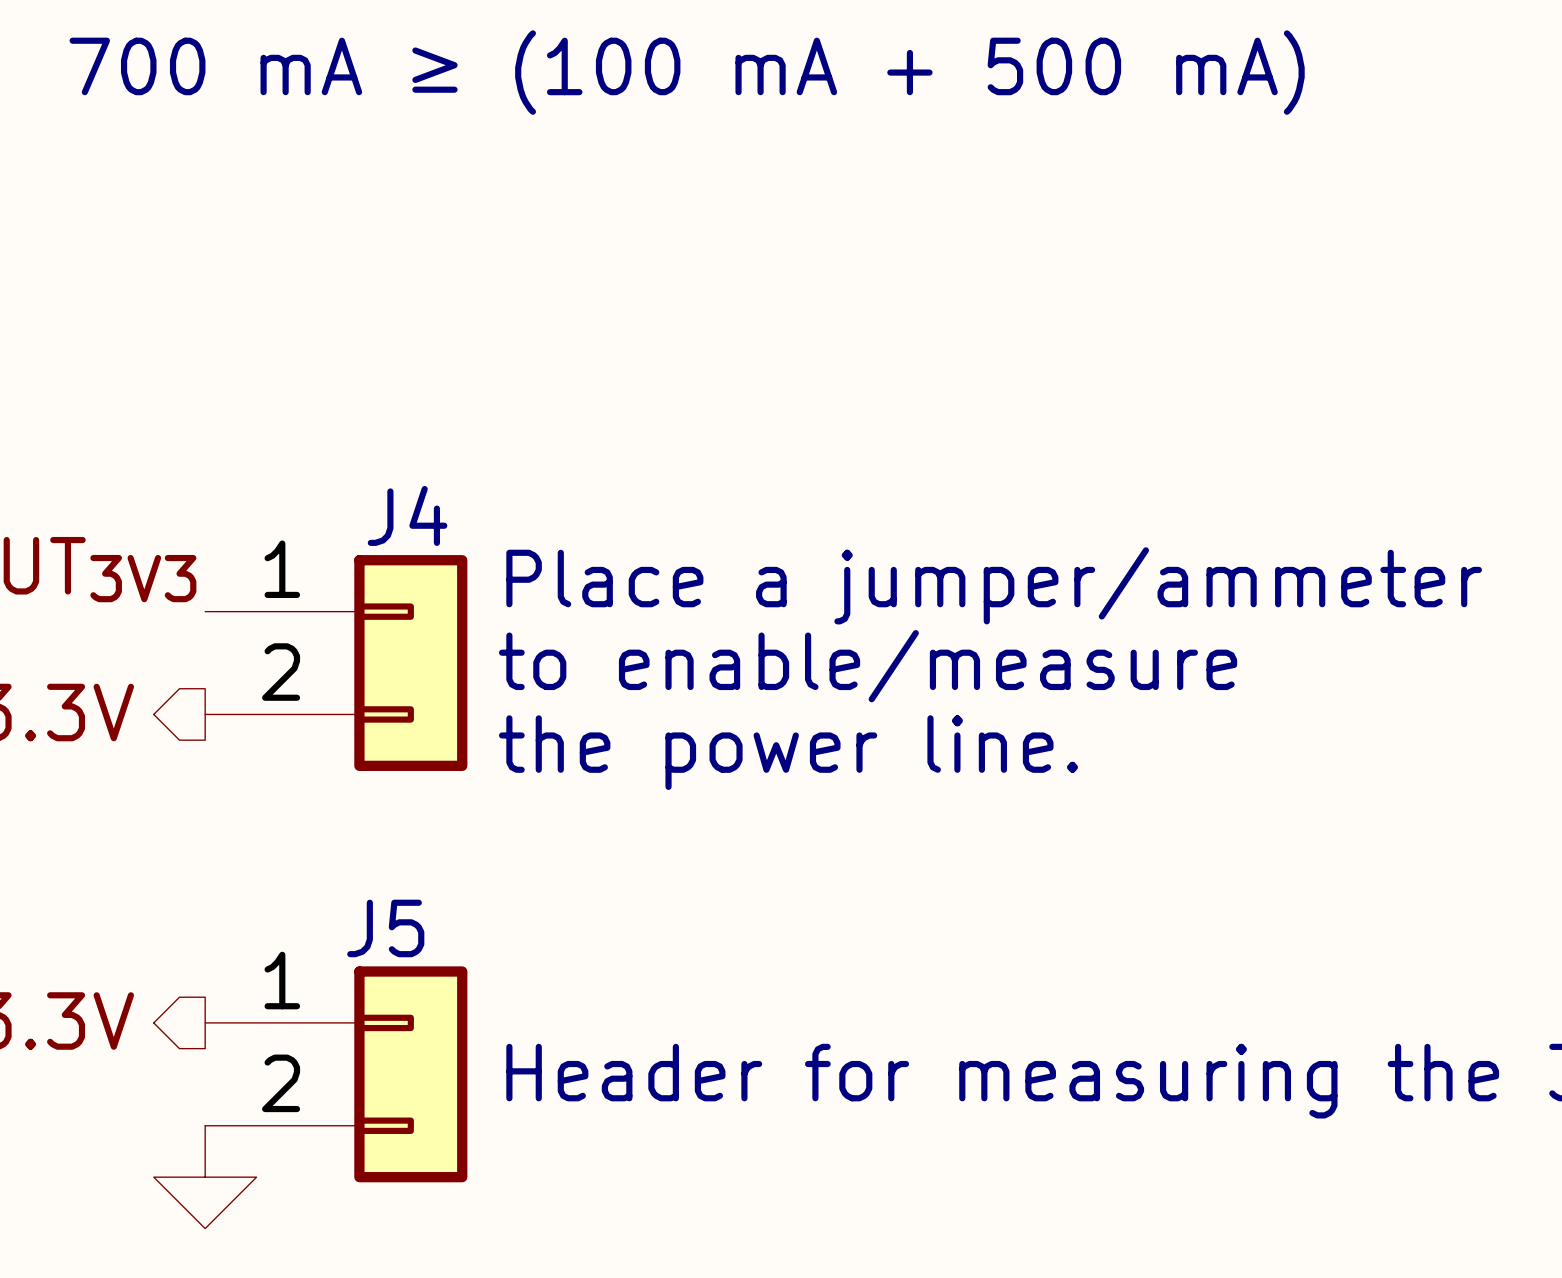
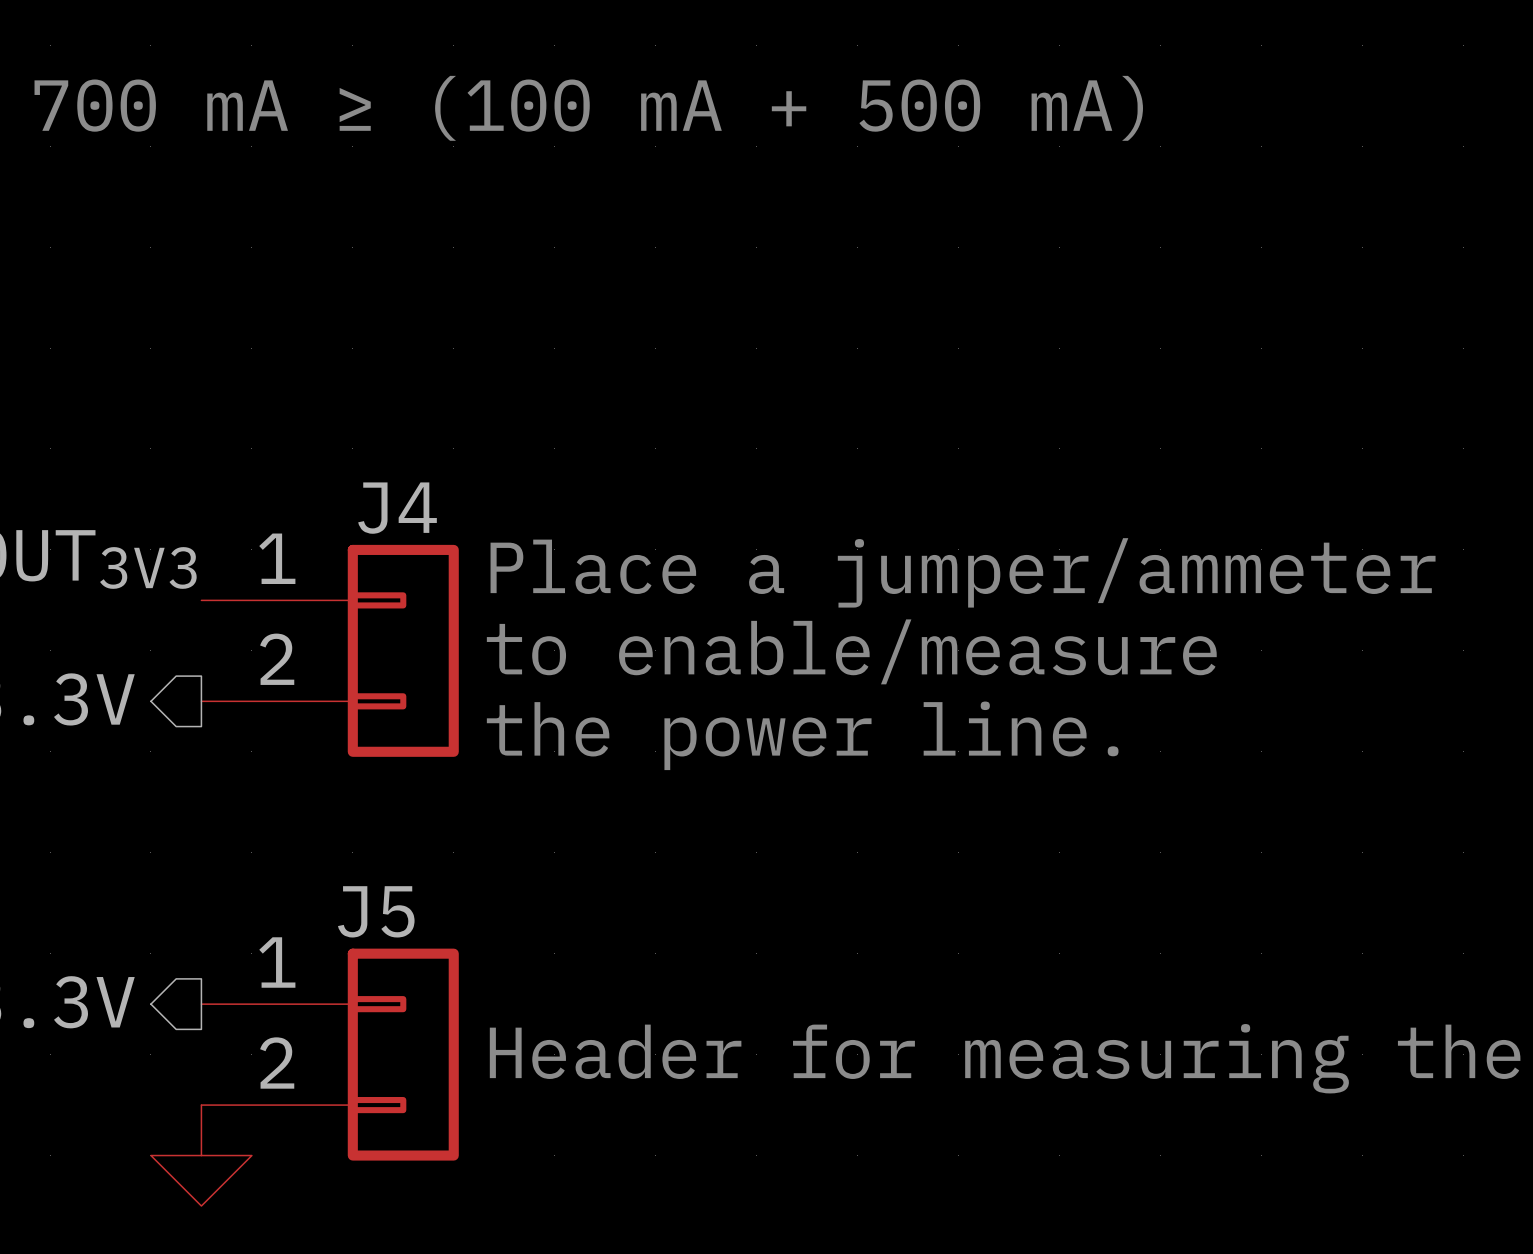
text position: 700 mA ≥ (100 mA + 500 mA) (687, 72) -> 700 mA ≥ (100 mA + 500 mA) (588, 108)

